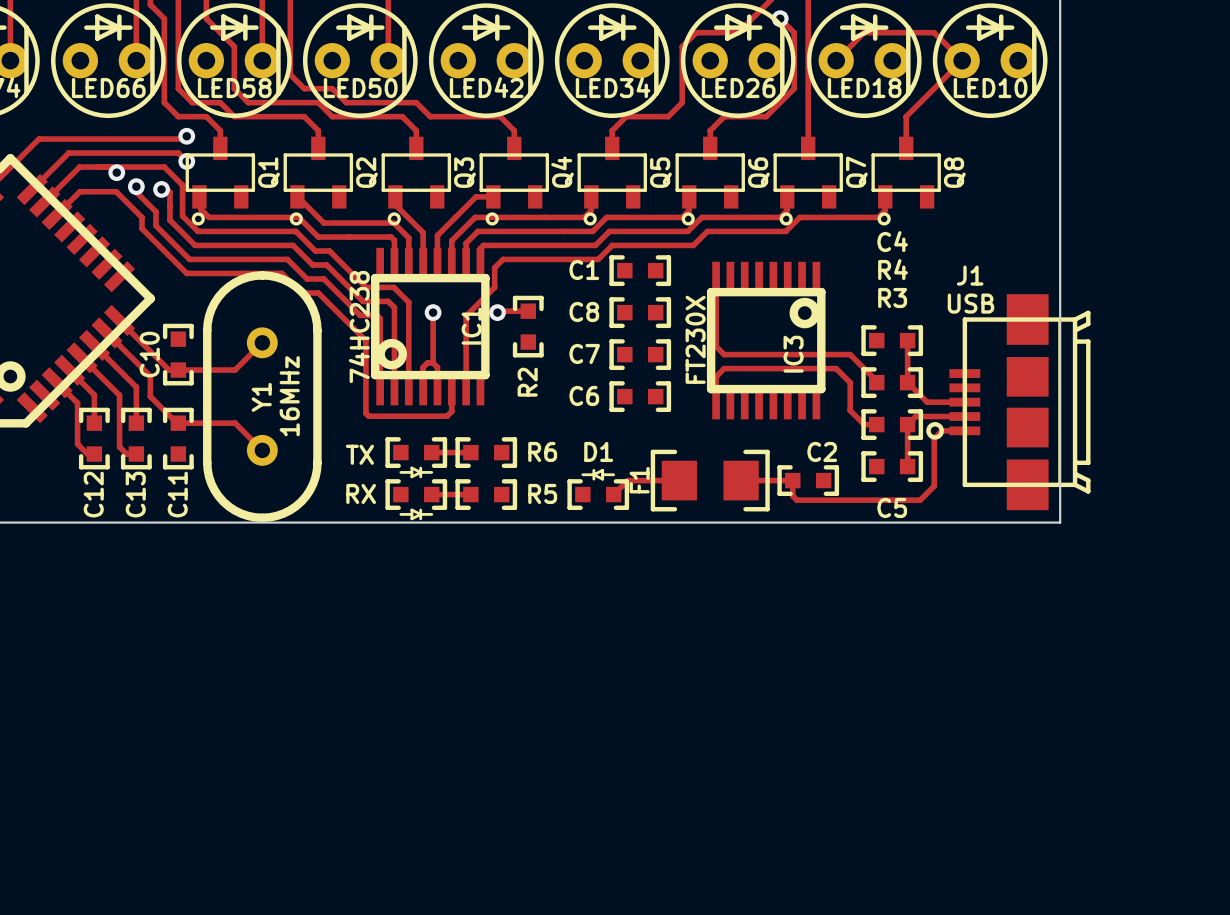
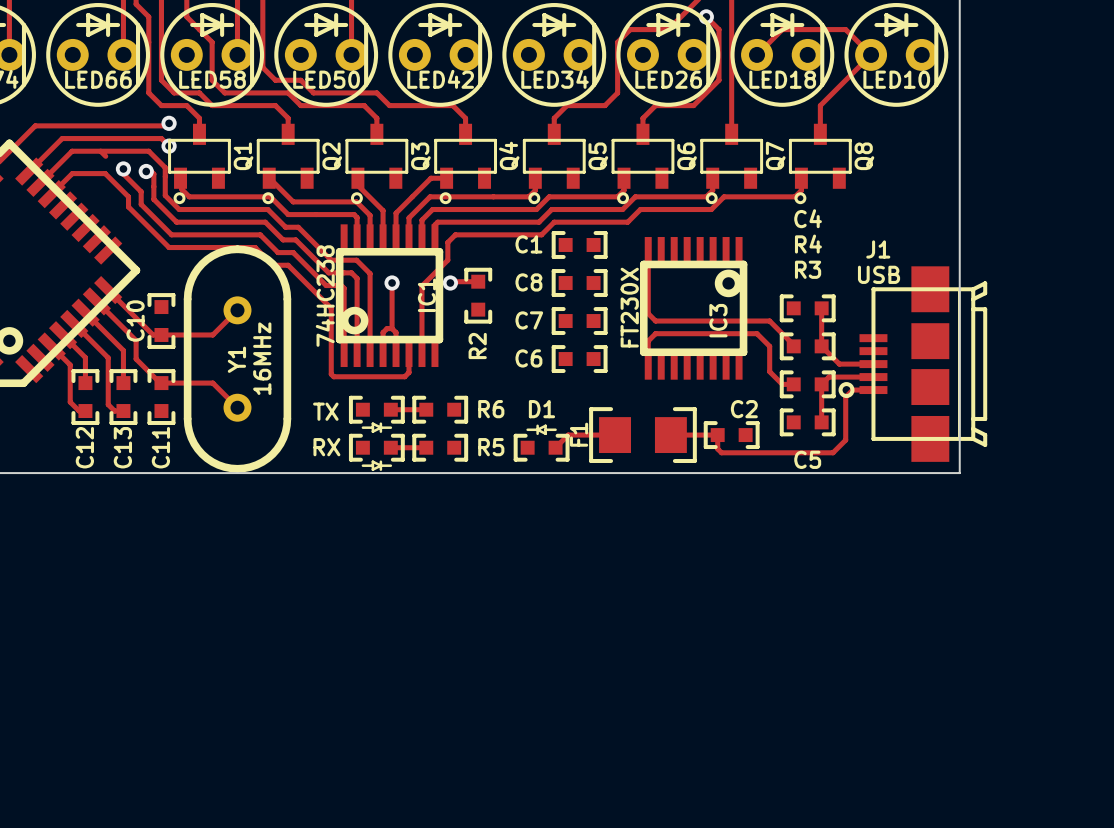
via: (116, 172) -> none

